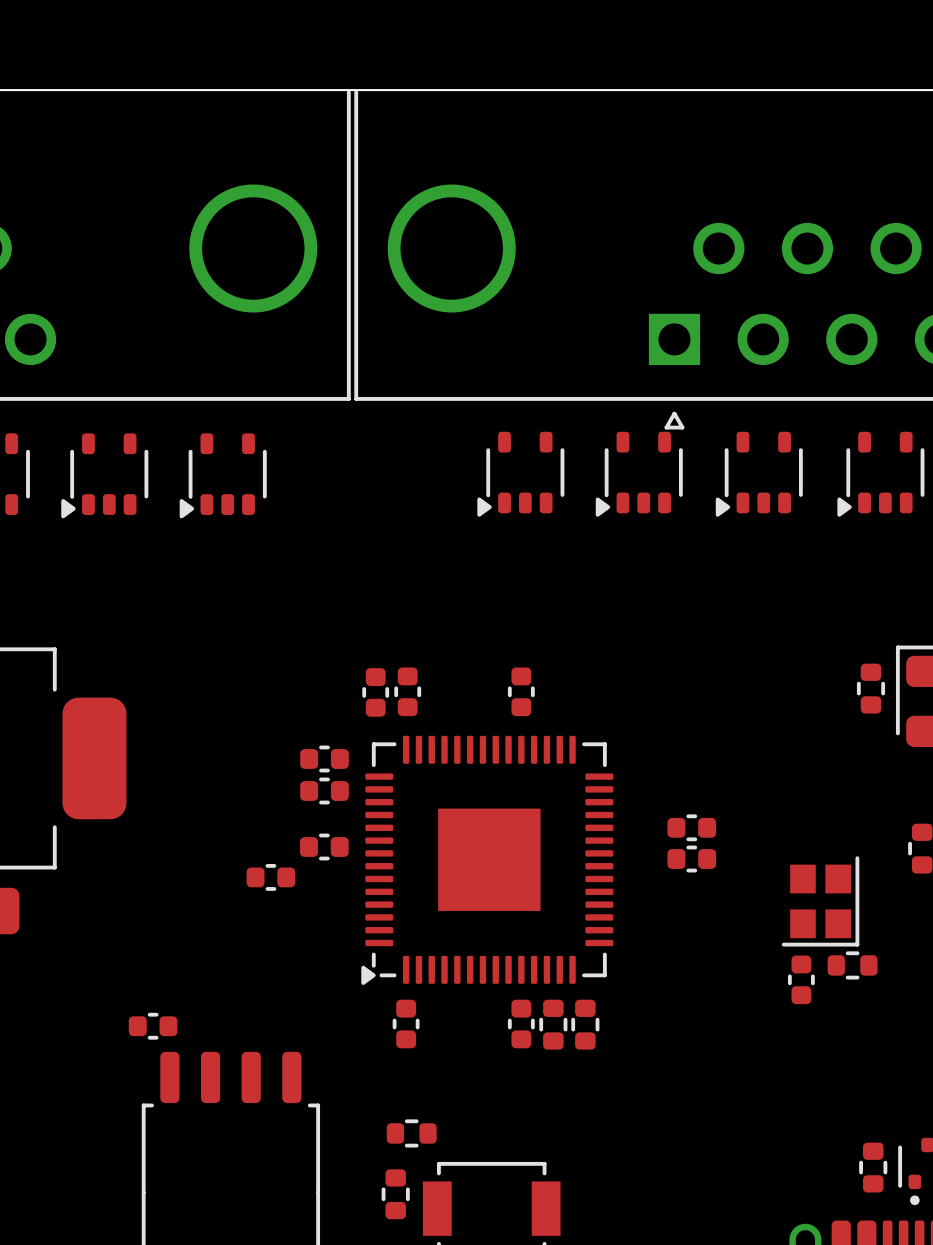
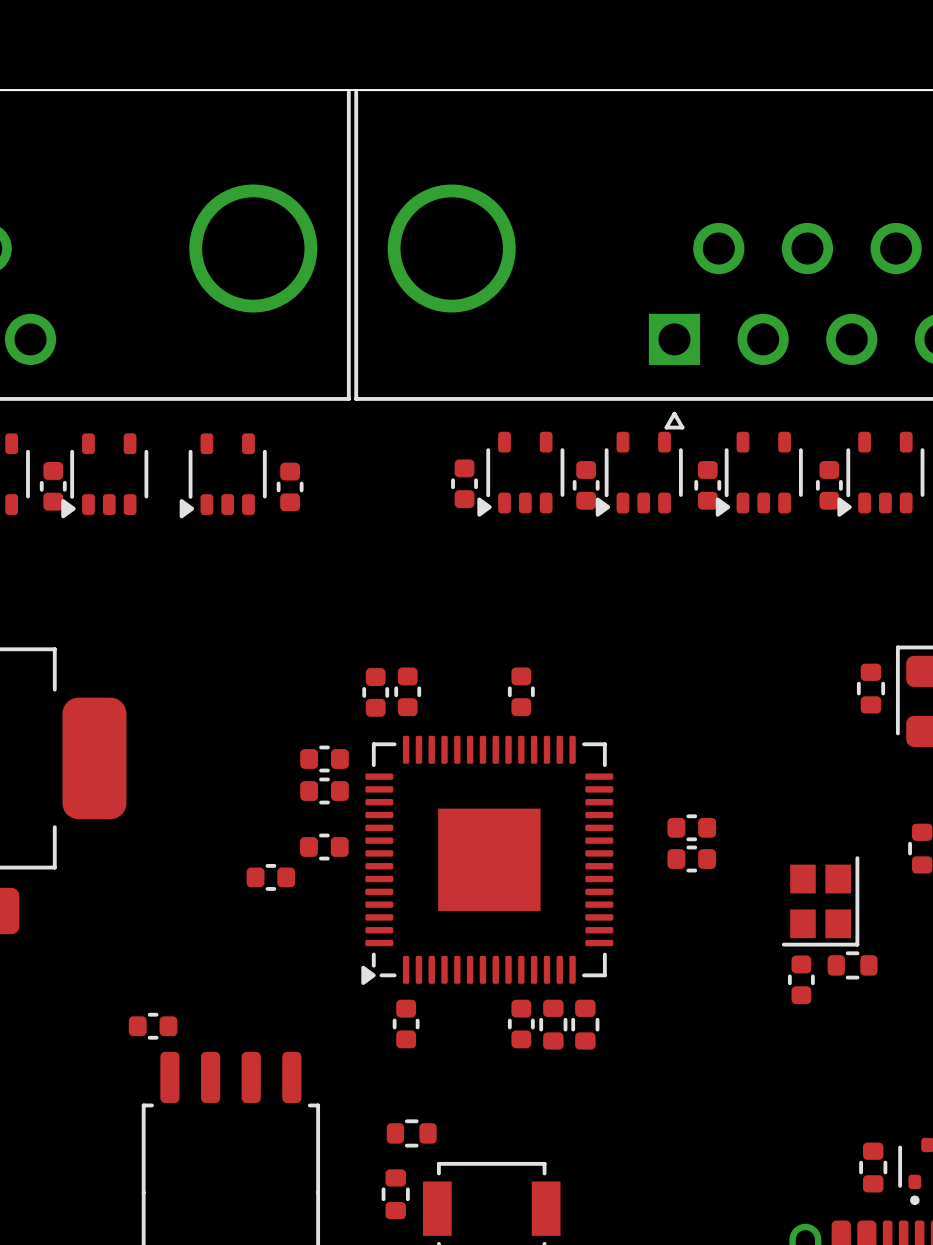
part: none -> (464, 483)
part: none -> (586, 485)
part: none -> (707, 485)
part: none -> (829, 485)
part: none -> (53, 486)
part: none -> (290, 486)

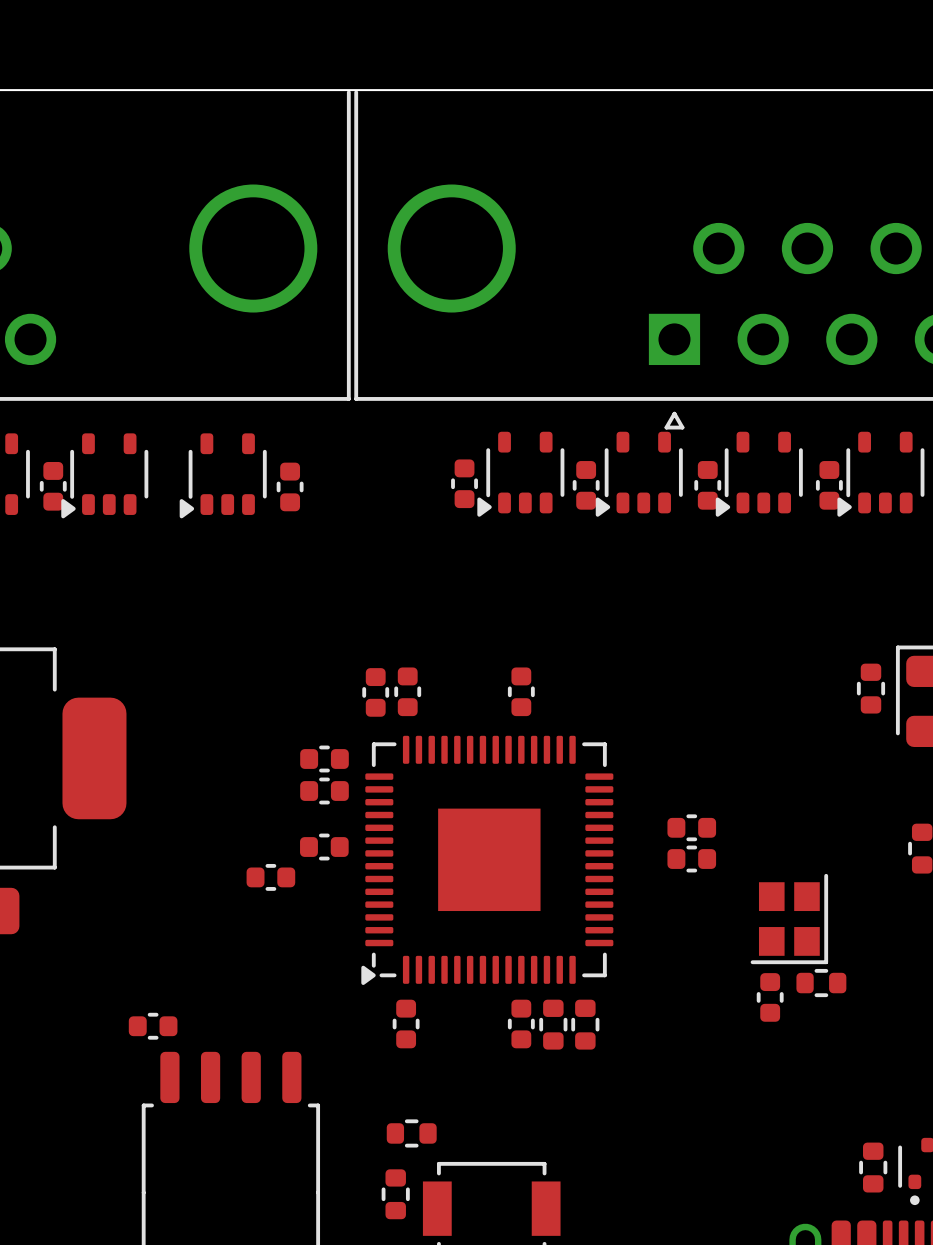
part position: (820, 901) -> (789, 919)
part position: (852, 965) -> (821, 983)
part position: (801, 979) -> (770, 997)

